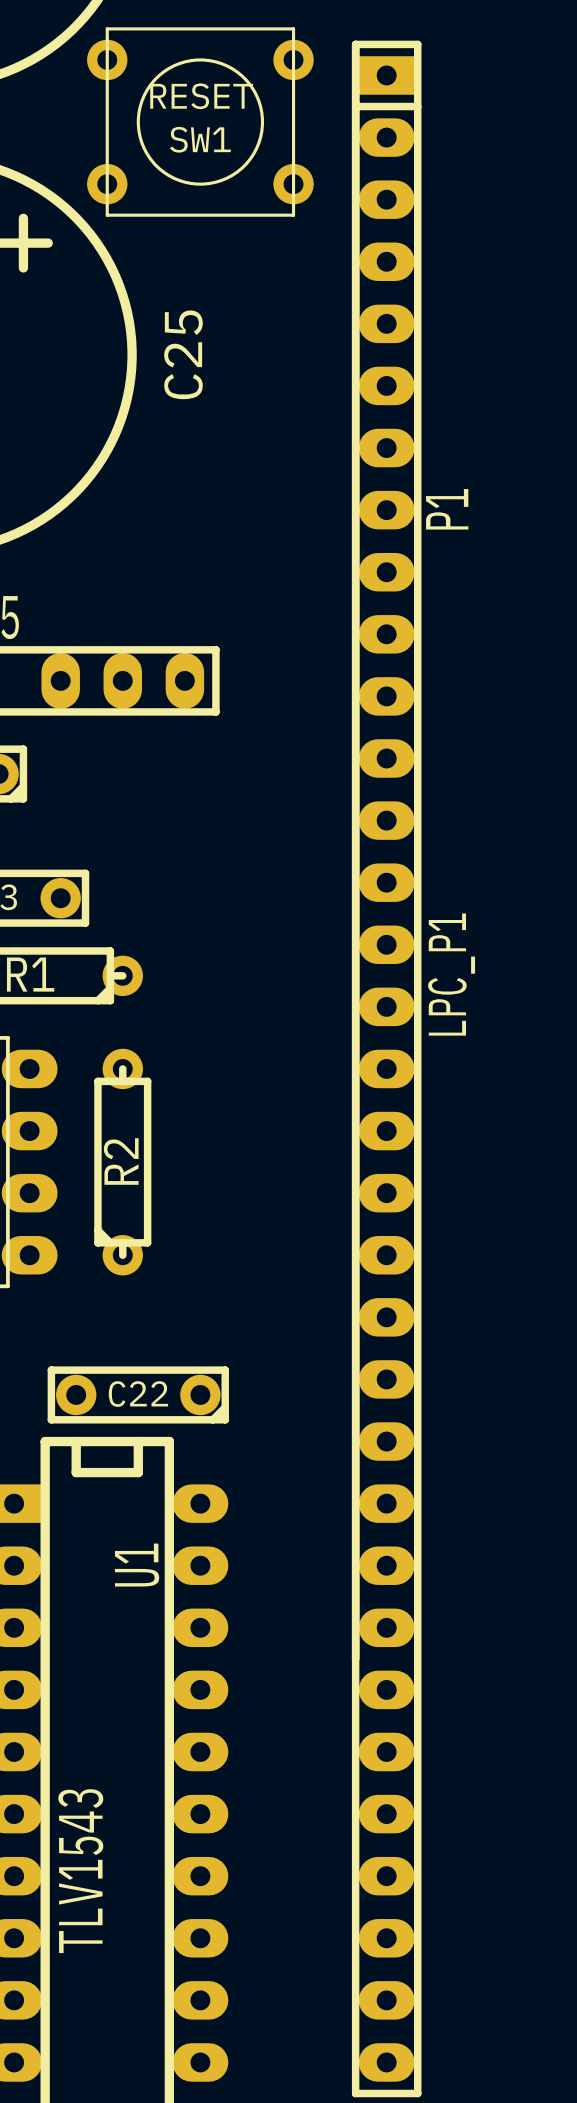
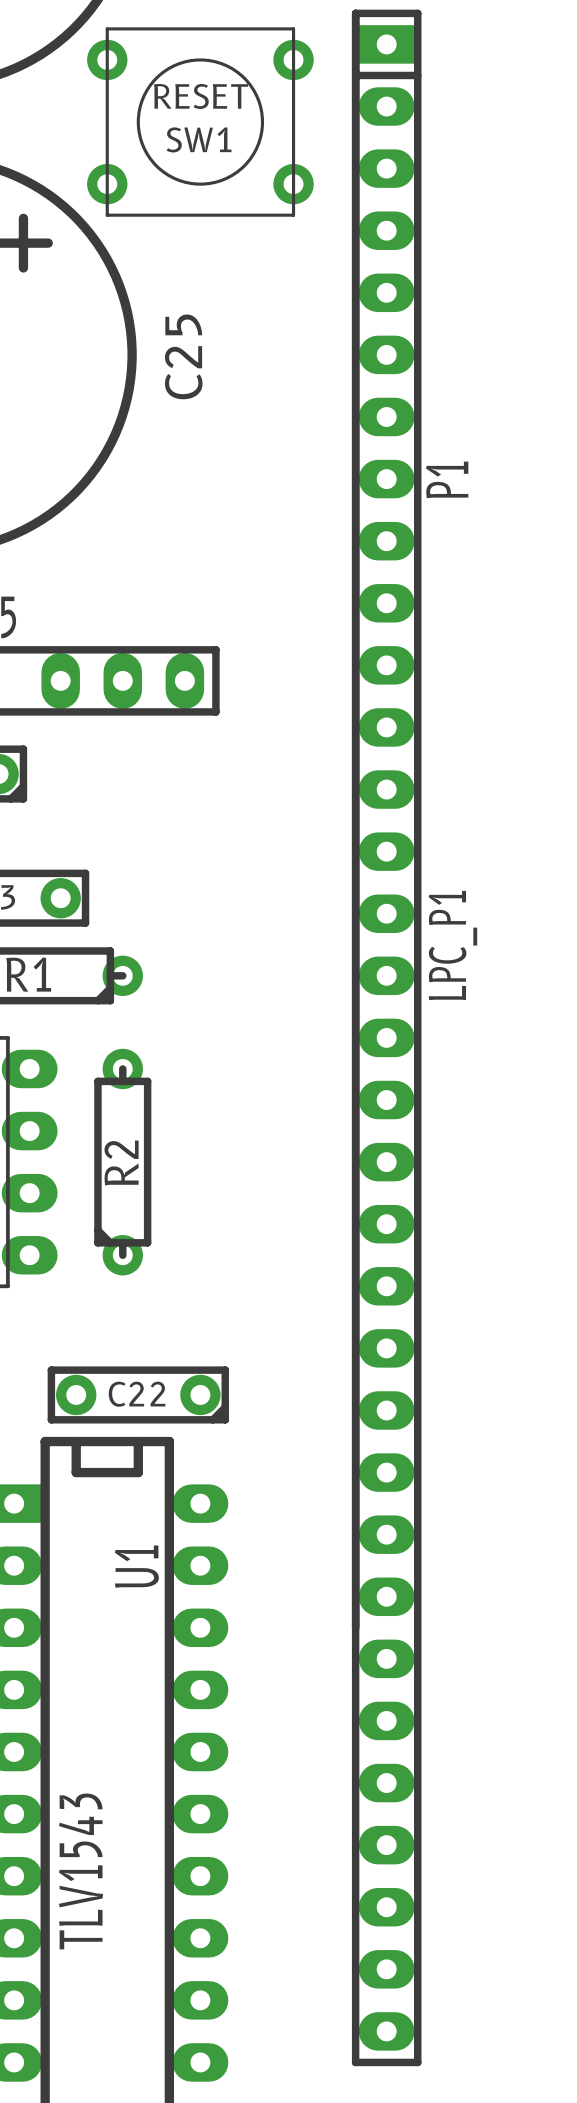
P1 position: (386, 1068) -> (386, 1037)

